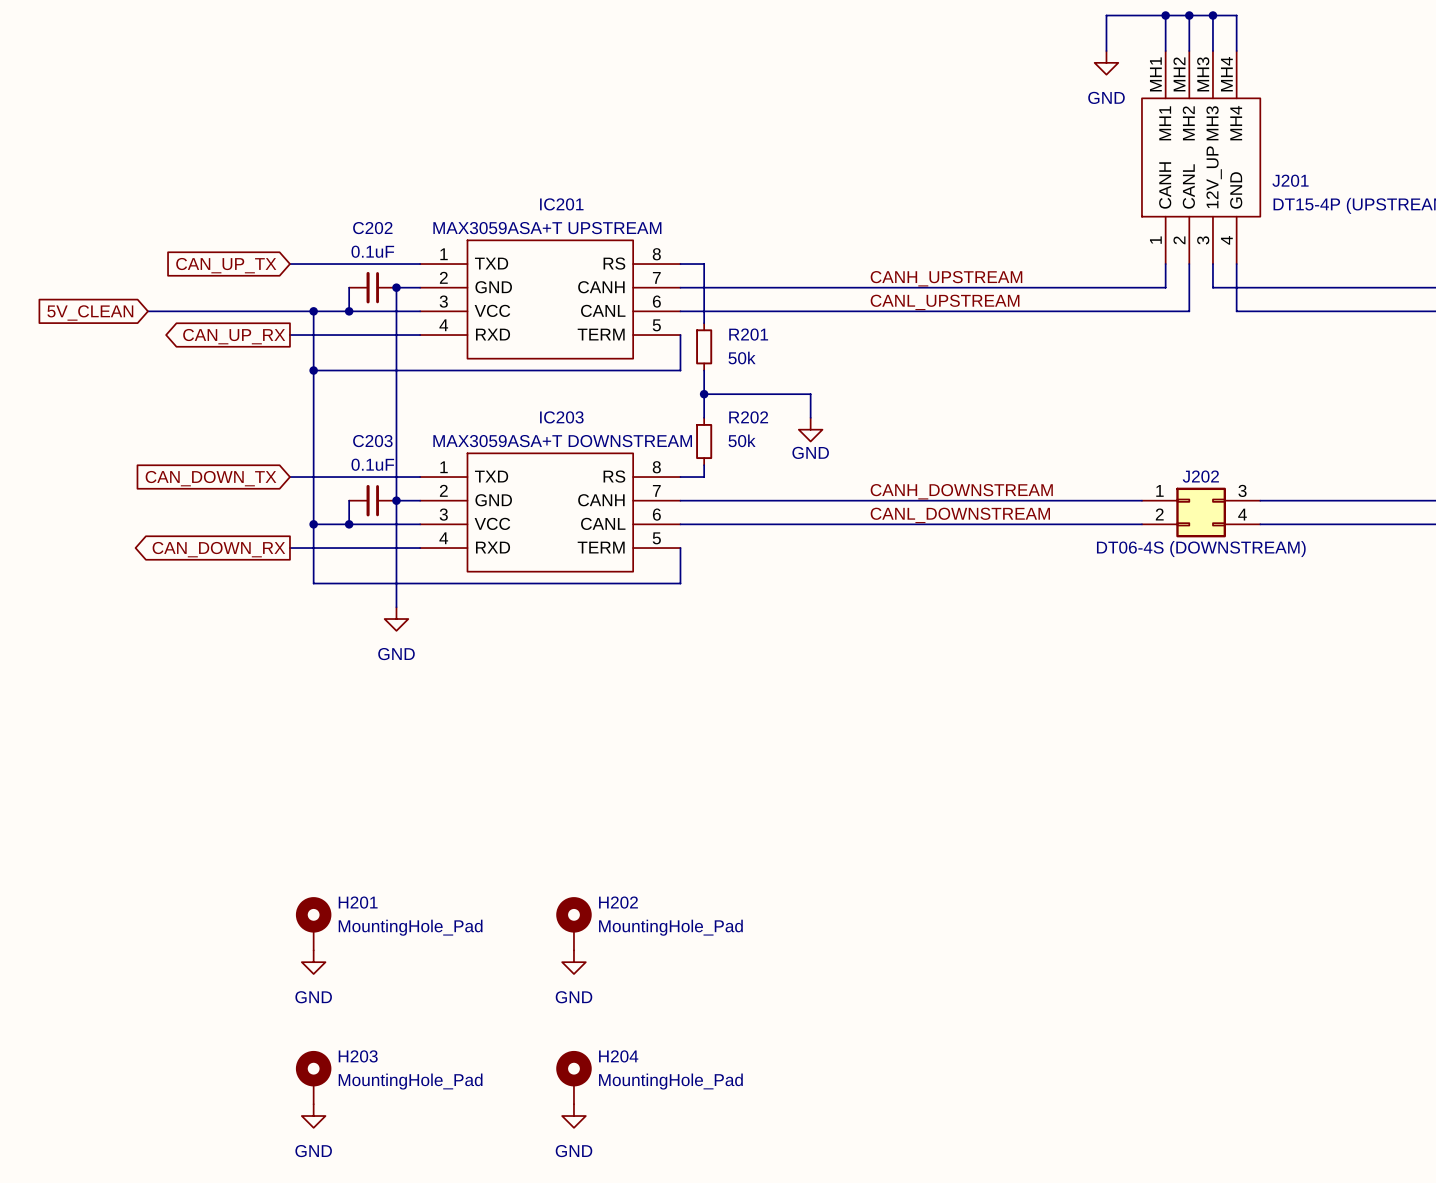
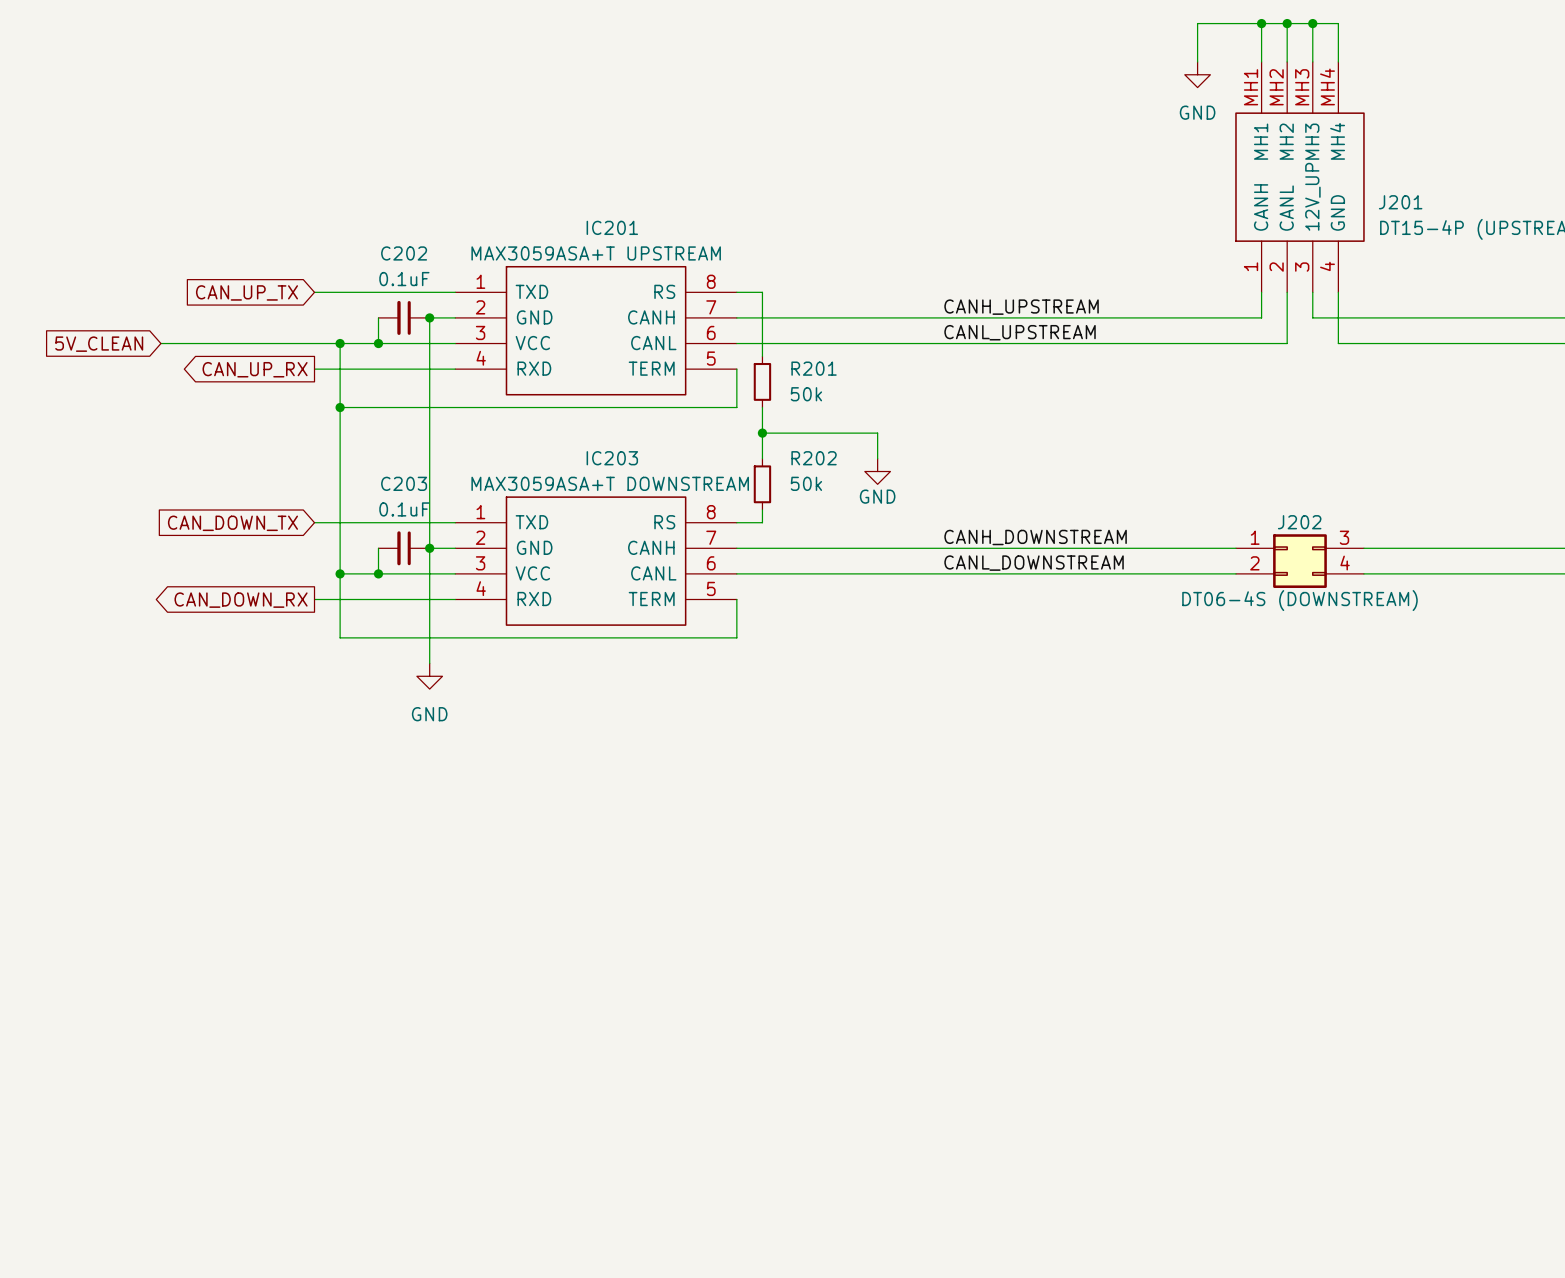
H201: MountingHole_Pad (313, 923) -> none
H202: MountingHole_Pad (573, 923) -> none
power symbol: GND (313, 962) -> none
power symbol: GND (573, 962) -> none
H203: MountingHole_Pad (313, 1077) -> none
H204: MountingHole_Pad (573, 1077) -> none
power symbol: GND (313, 1116) -> none
power symbol: GND (573, 1116) -> none

